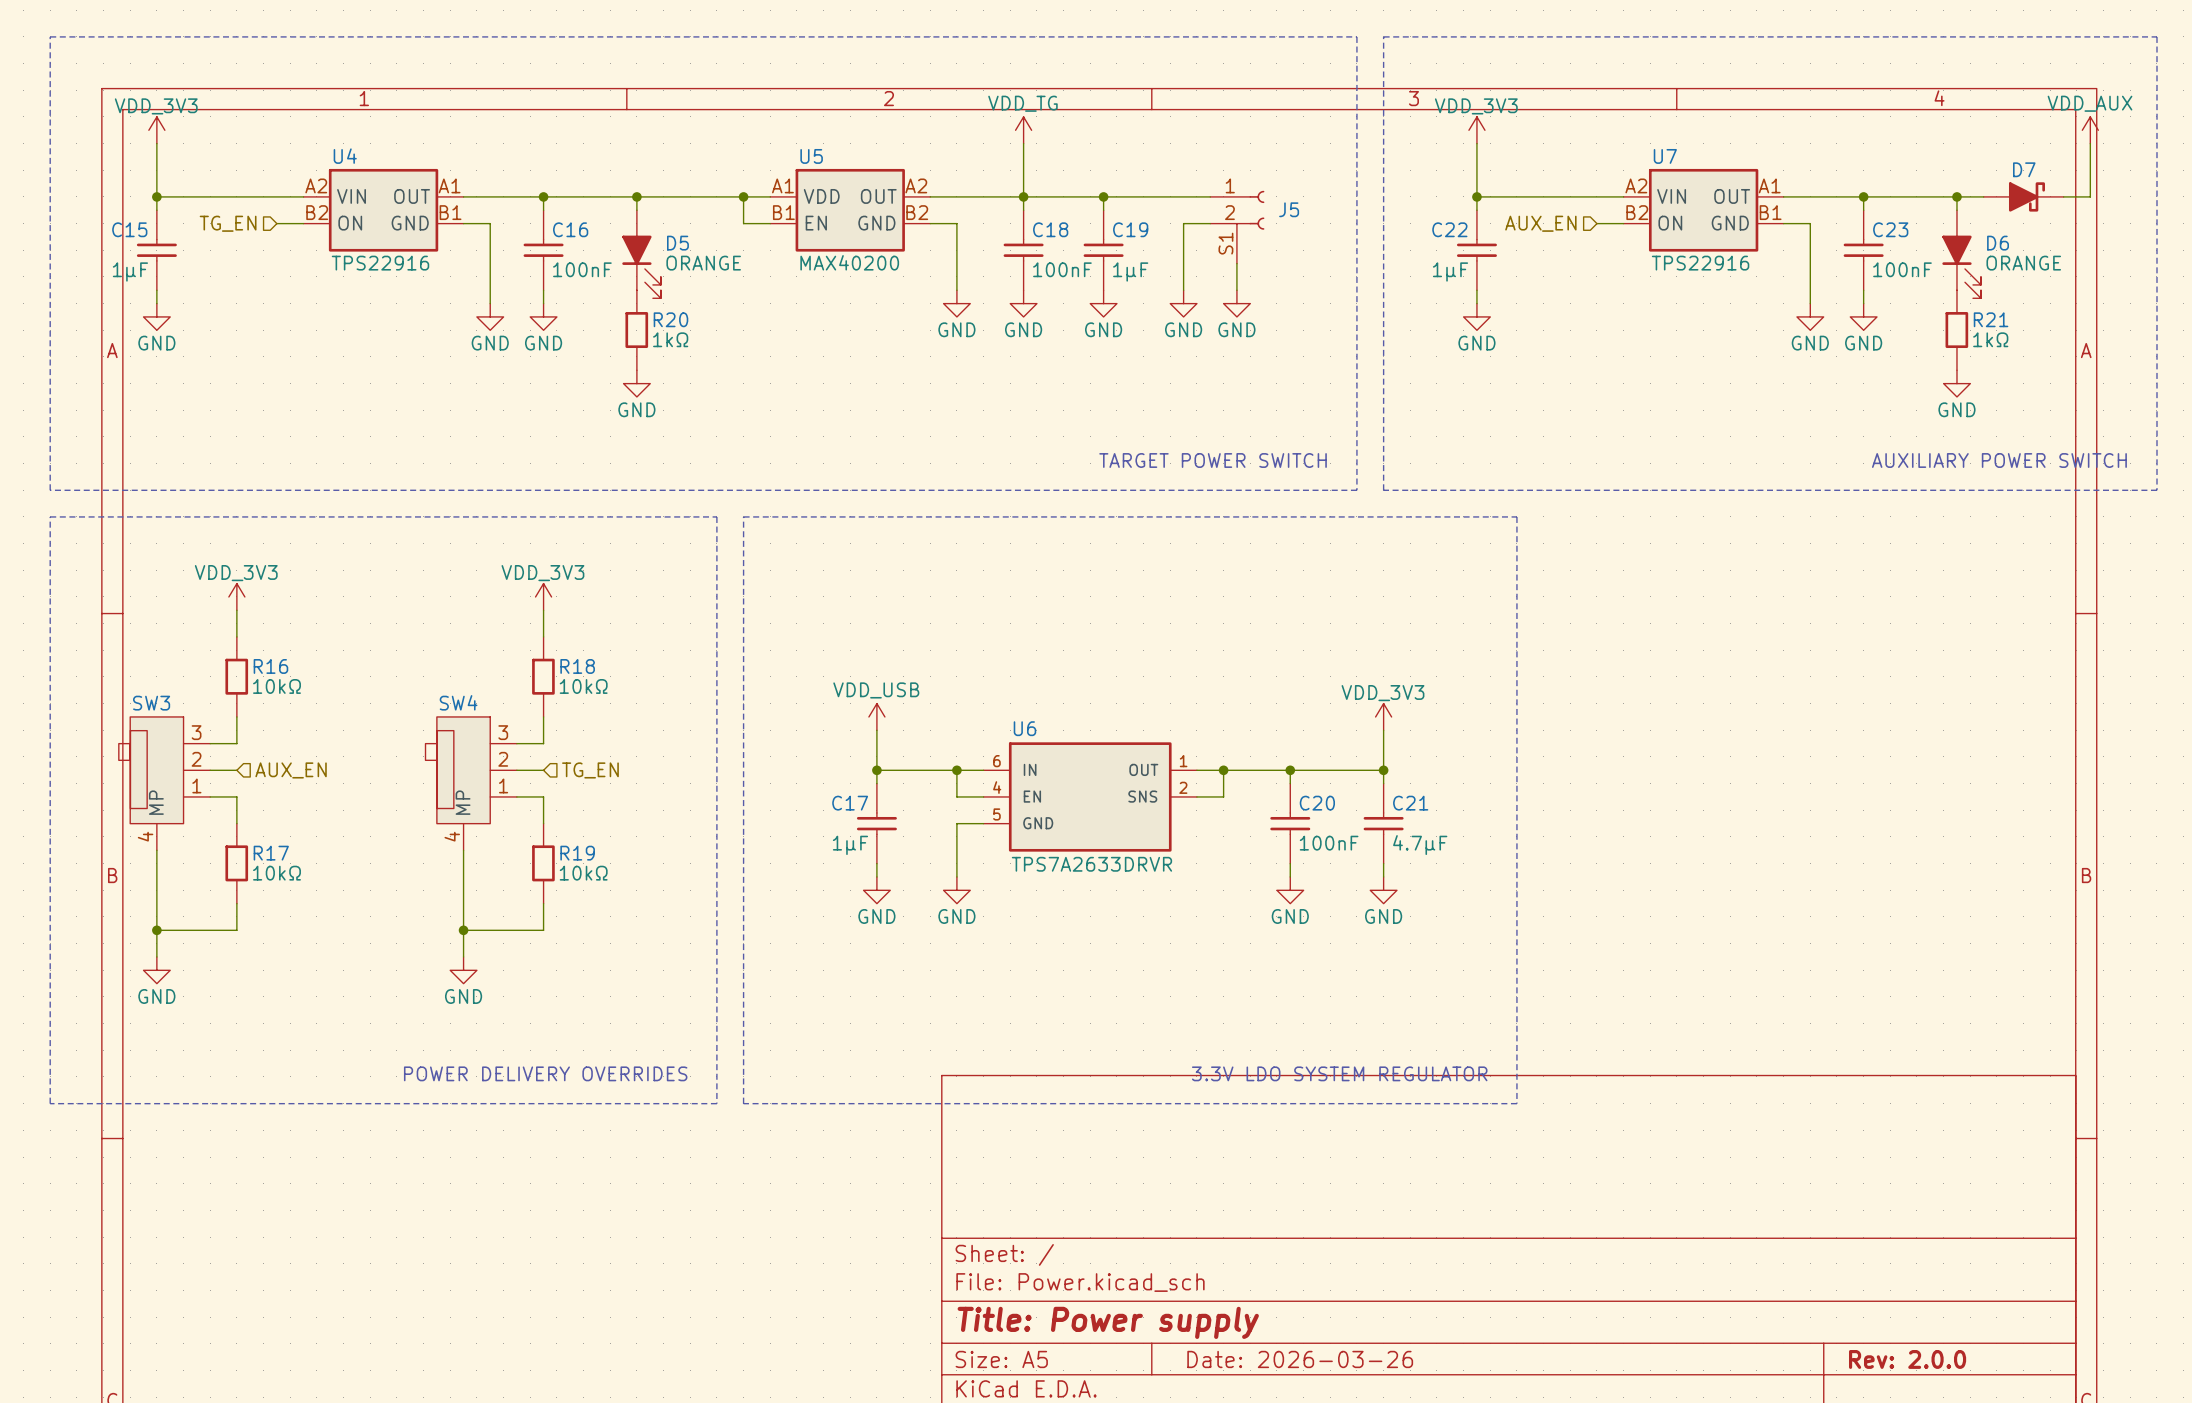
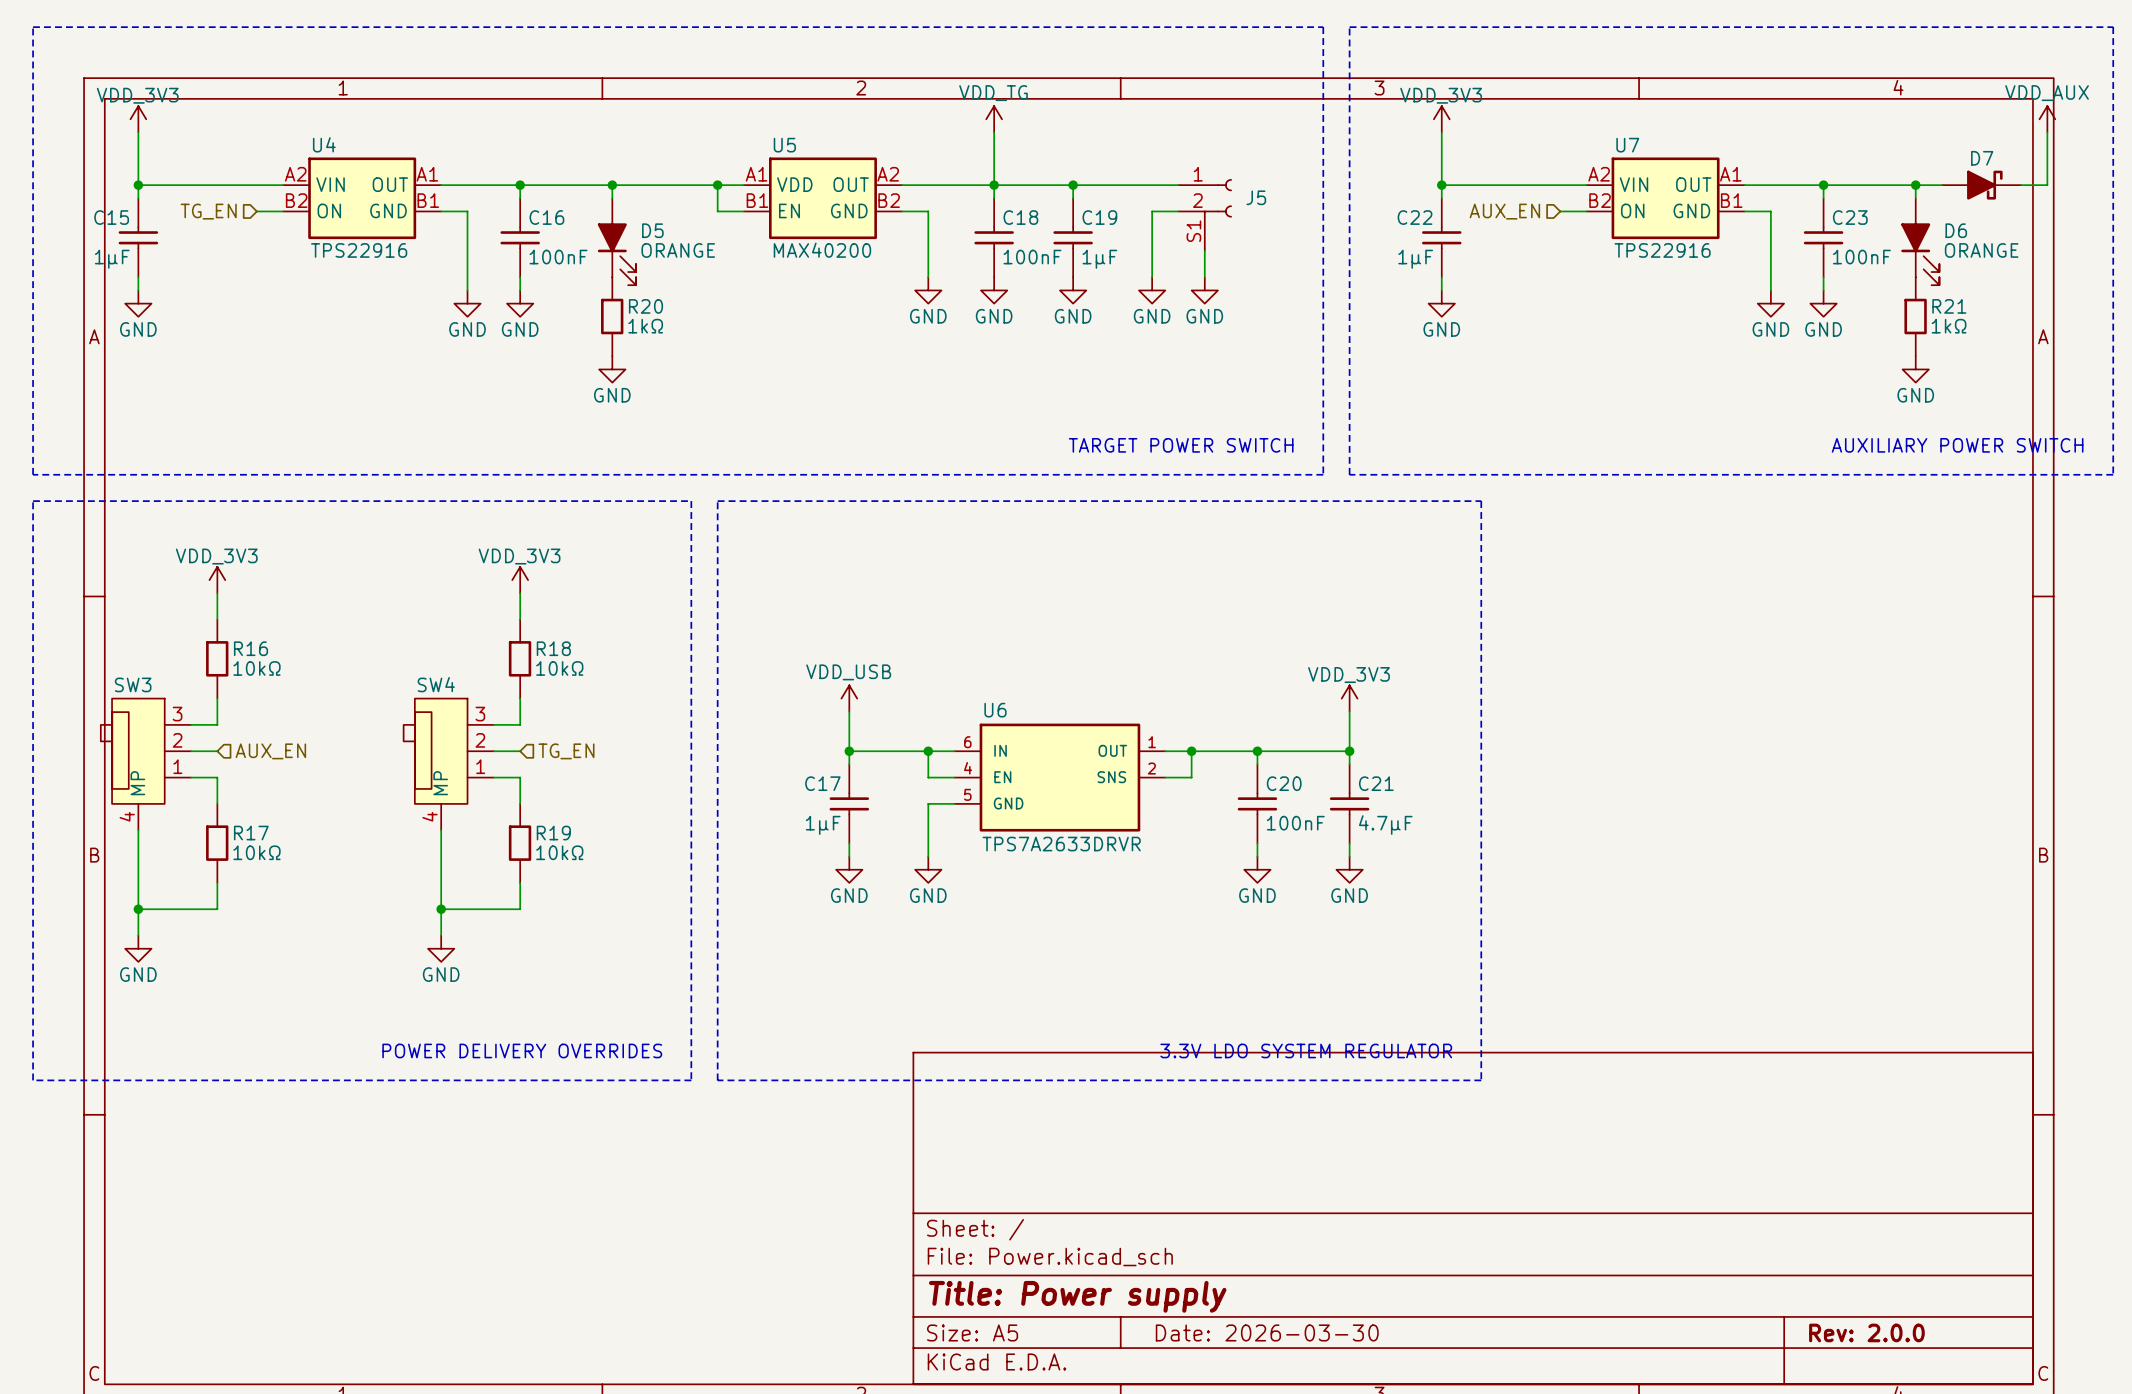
title block: Date: 2026-03-26 (1300, 1359) -> Date: 2026-03-30 (1267, 1332)

